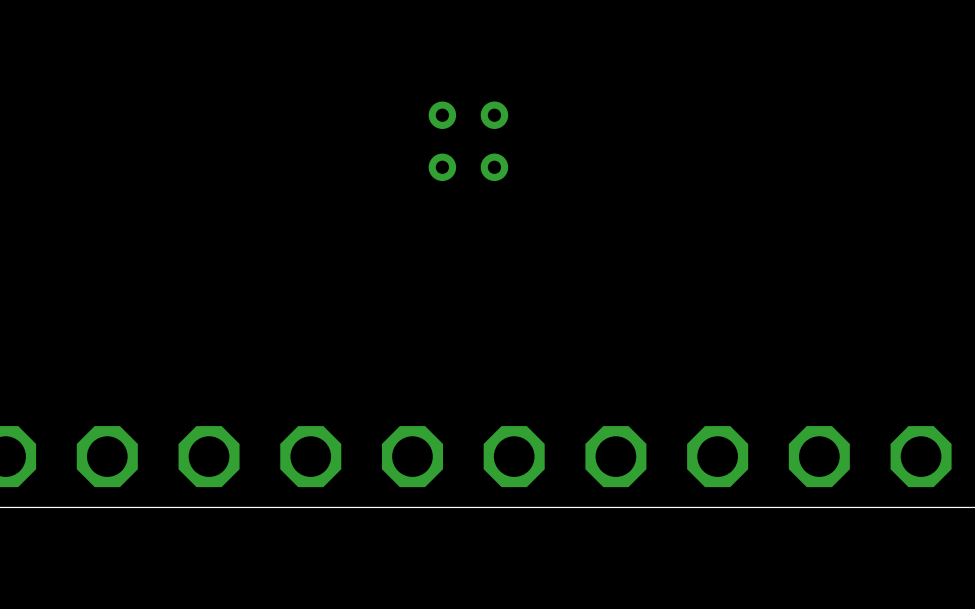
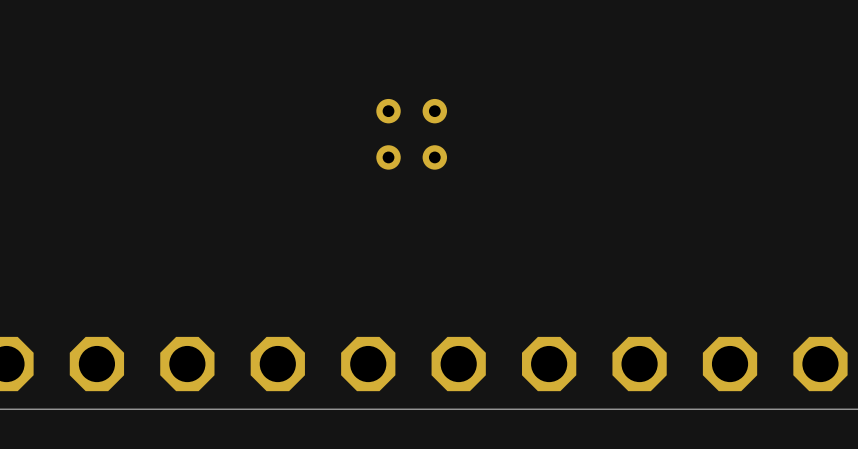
part position: (468, 141) -> (411, 134)

